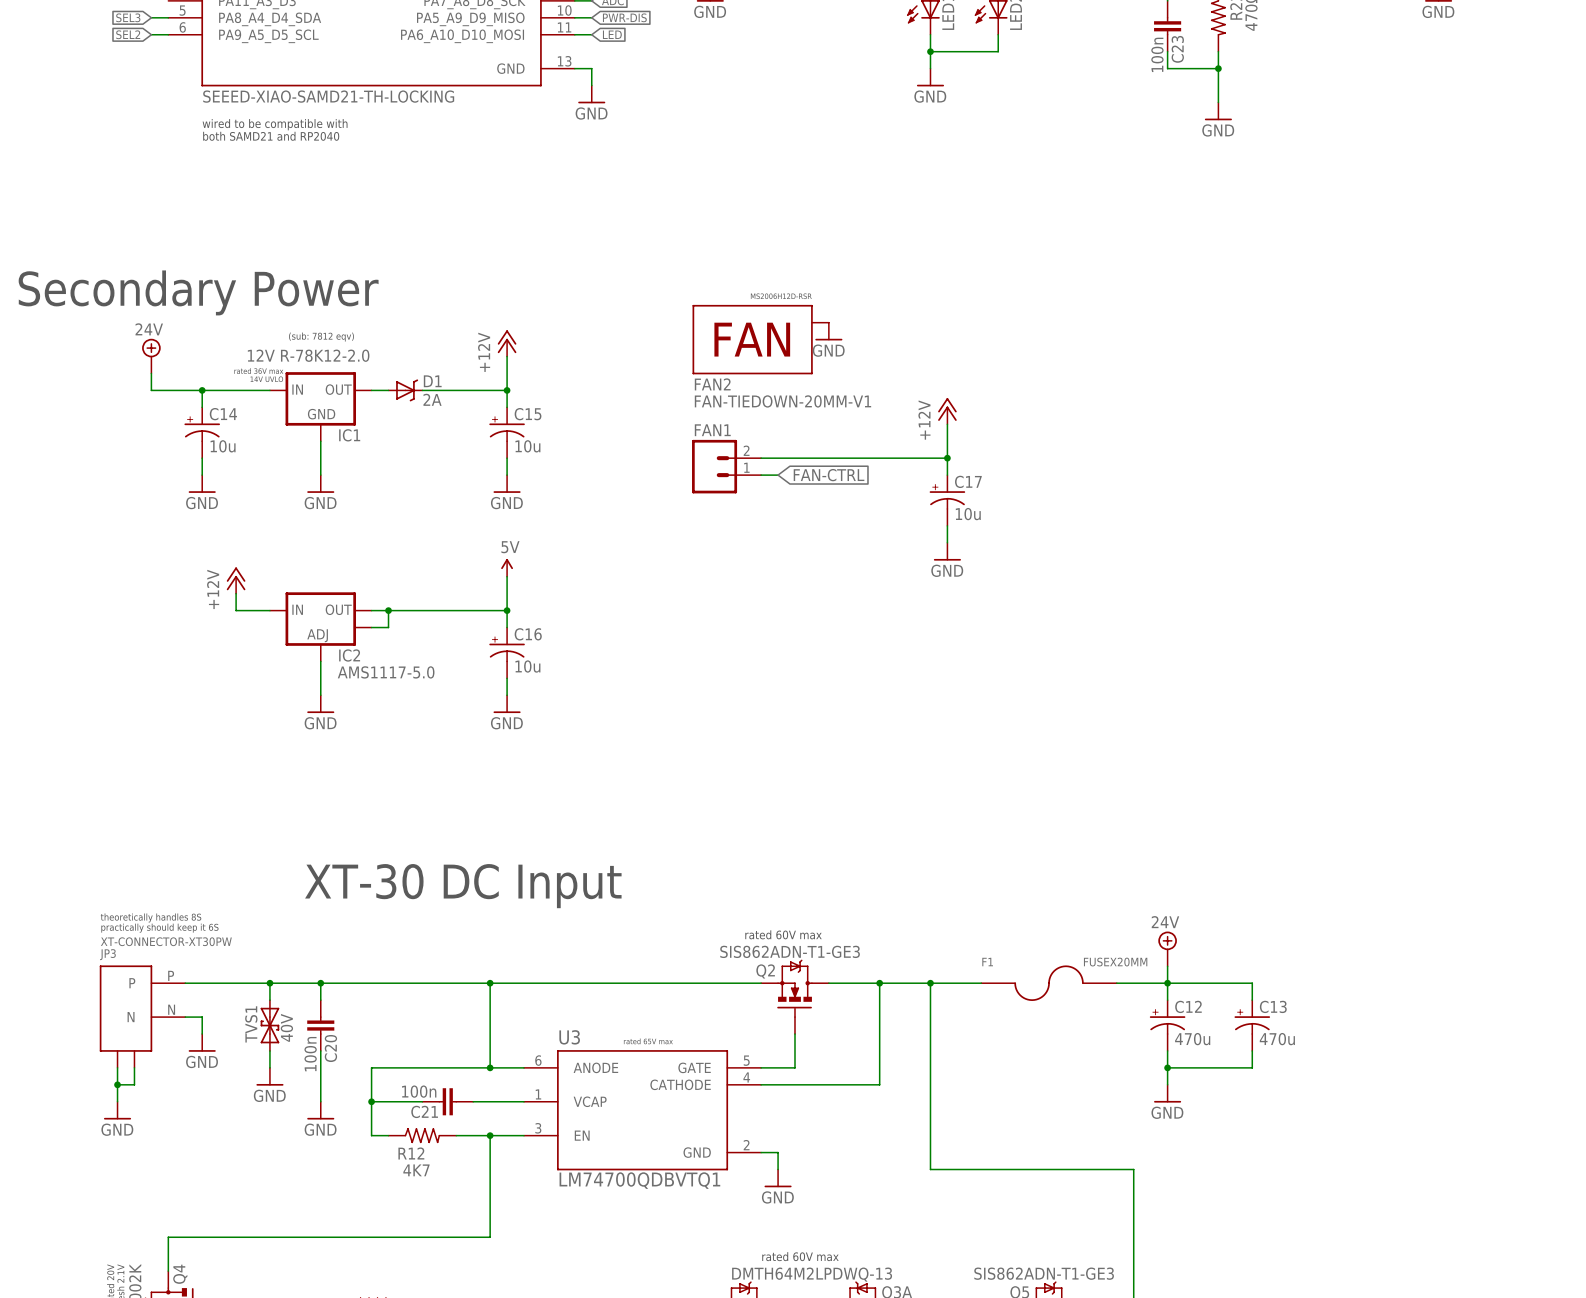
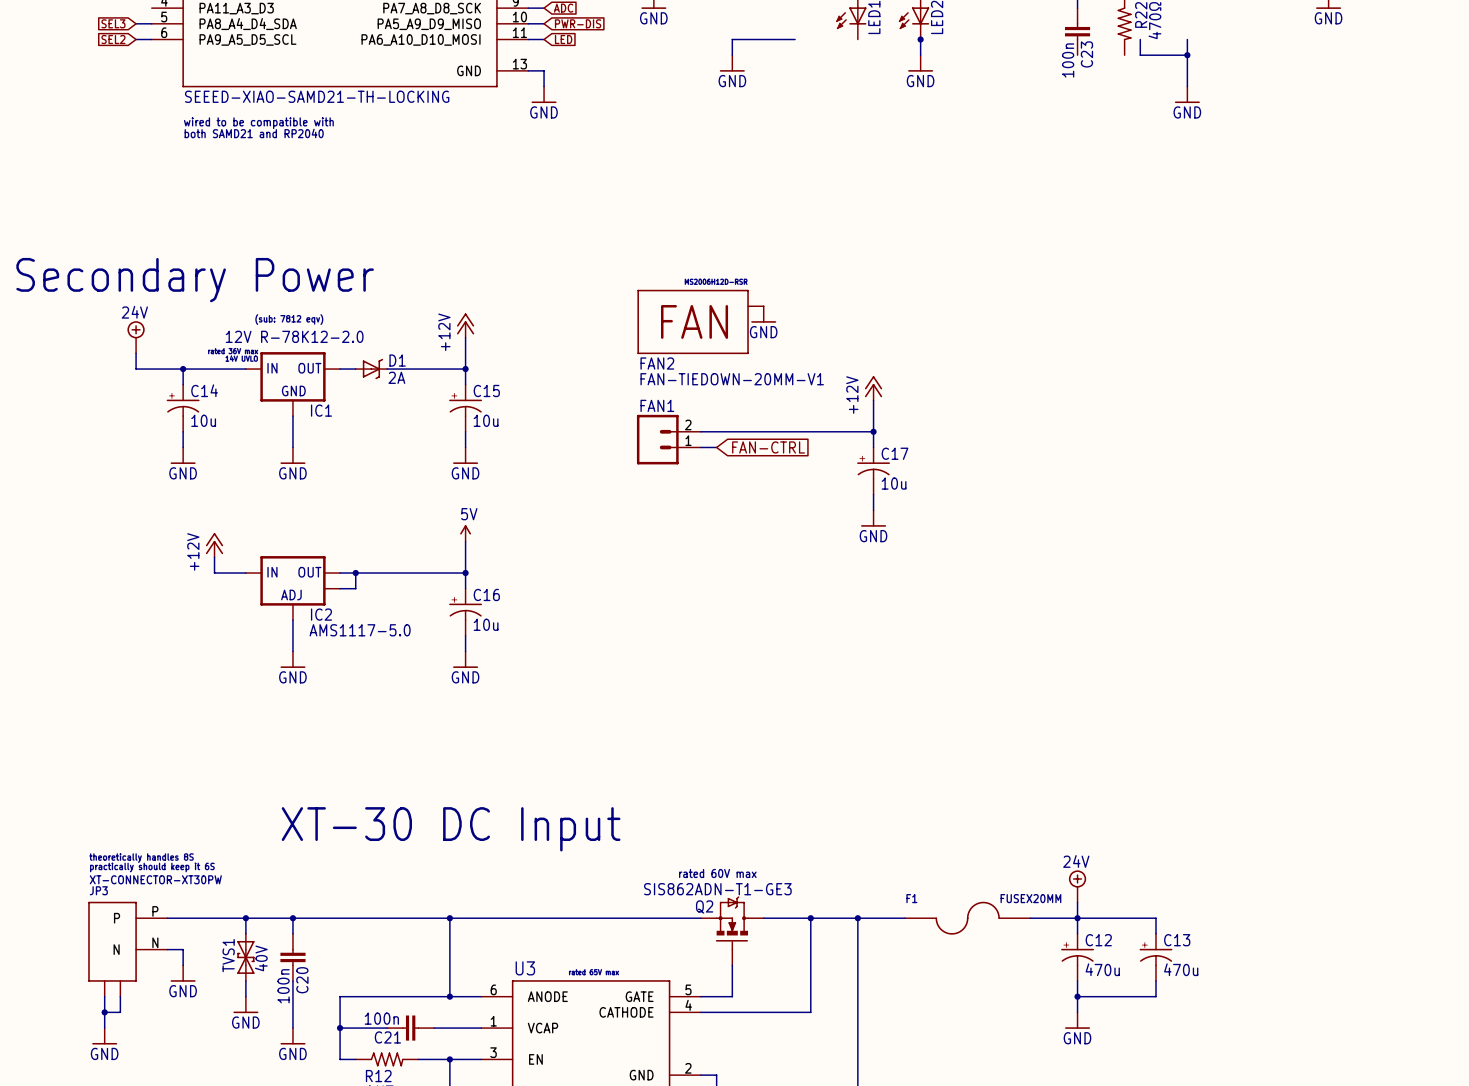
wire: none -> (795, 39) (732, 39) (732, 55)
wire: (930, 34) (930, 68) -> none
junction: none -> (920, 39)
wire: (930, 51) (998, 51) -> none
junction: (930, 51) -> none
wire: (1167, 51) (1167, 68) (1218, 68) -> (1140, 39) (1140, 55) (1187, 55)
wire: (1218, 51) (1218, 102) -> (1187, 39) (1187, 86)
junction: none -> (1187, 55)
power symbol: none -> GND (732, 63)
power symbol: none -> GND (920, 63)
junction: (1218, 68) -> none
power symbol: GND (930, 77) -> none
power symbol position: GND (1218, 111) -> GND (1187, 94)

